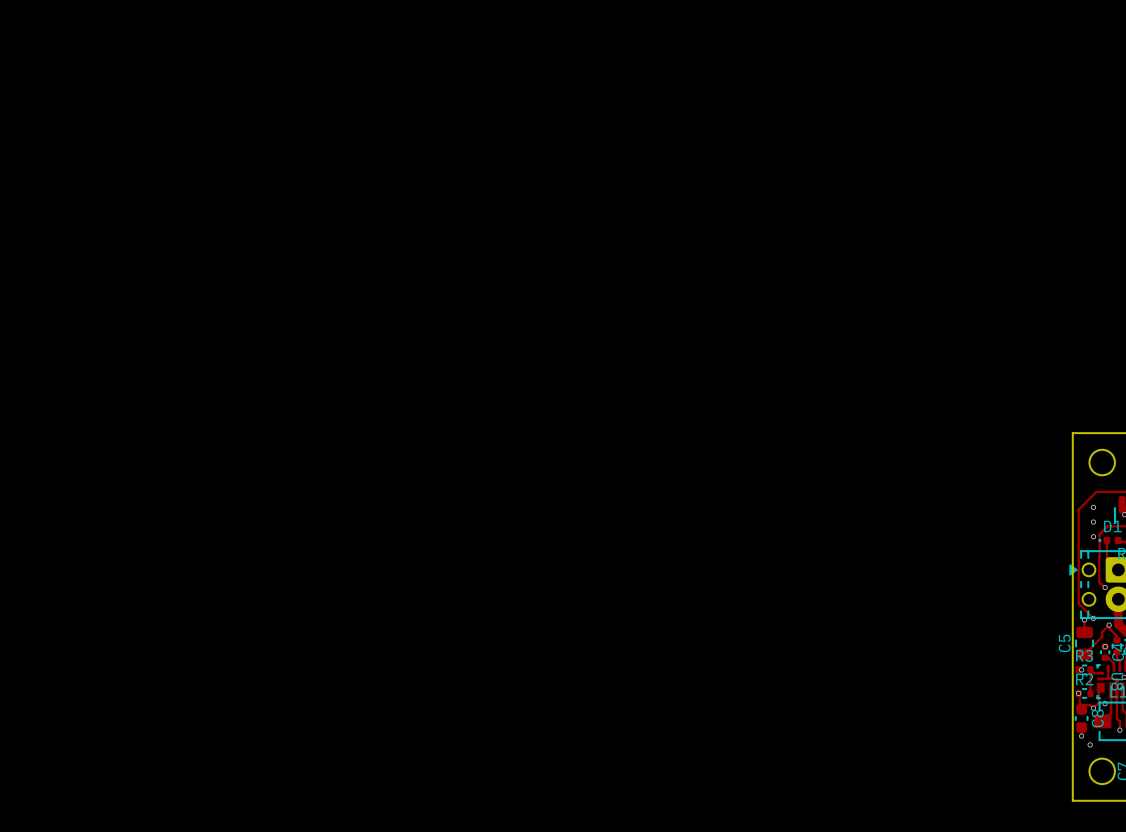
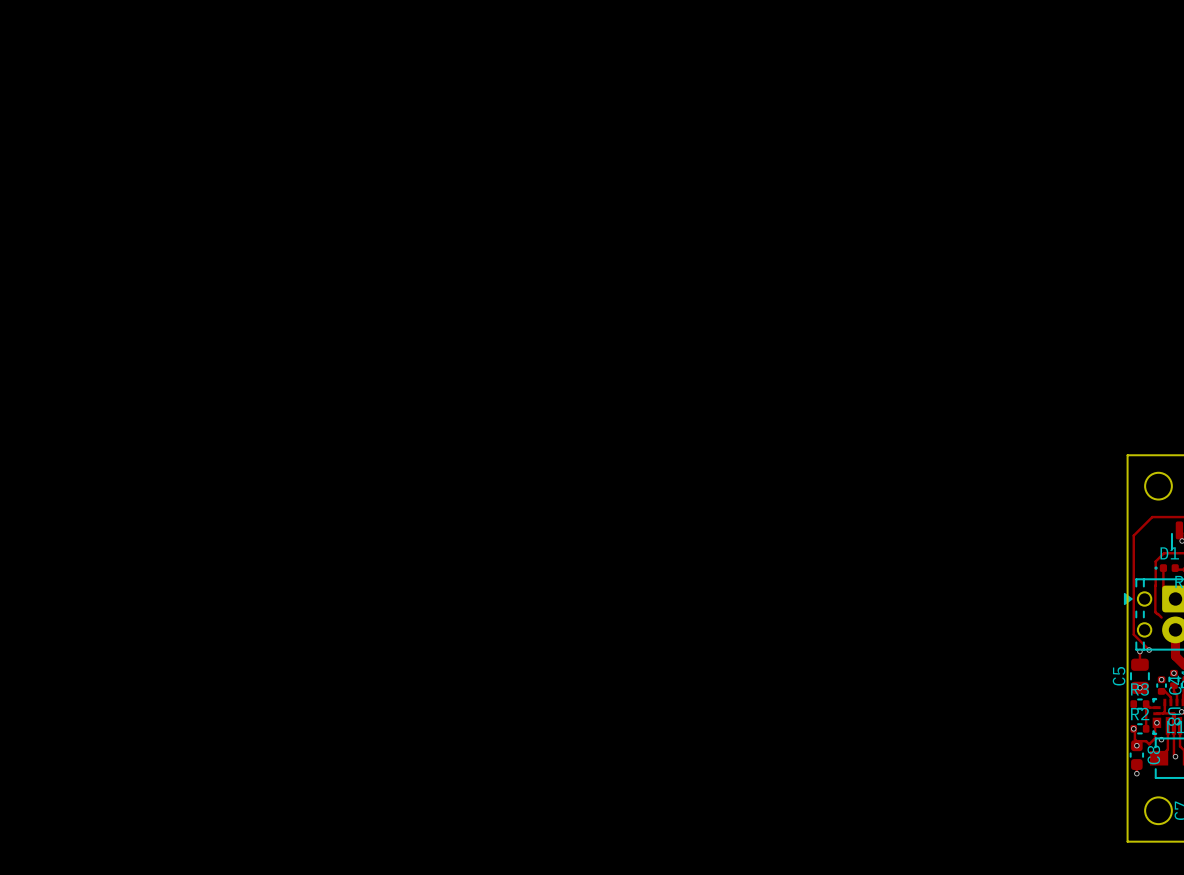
via: (1093, 507) -> none
via: (1093, 522) -> none
via: (1093, 536) -> none
via: (1105, 587) -> none
via: (1109, 625) -> none
track: (1116, 640) (1116, 636) (1109, 628) (1109, 625) (1102, 632) (1102, 636) (1084, 654) -> none
via: none -> (1173, 673)
via: none -> (1139, 687)
via: (1081, 669) -> none
via: none -> (1156, 722)
via: (1093, 708) -> none
via: none -> (1136, 745)
track: (1118, 719) (1119, 730) -> none
via: none -> (1175, 756)
via: (1119, 730) -> none
via: (1090, 744) -> none

